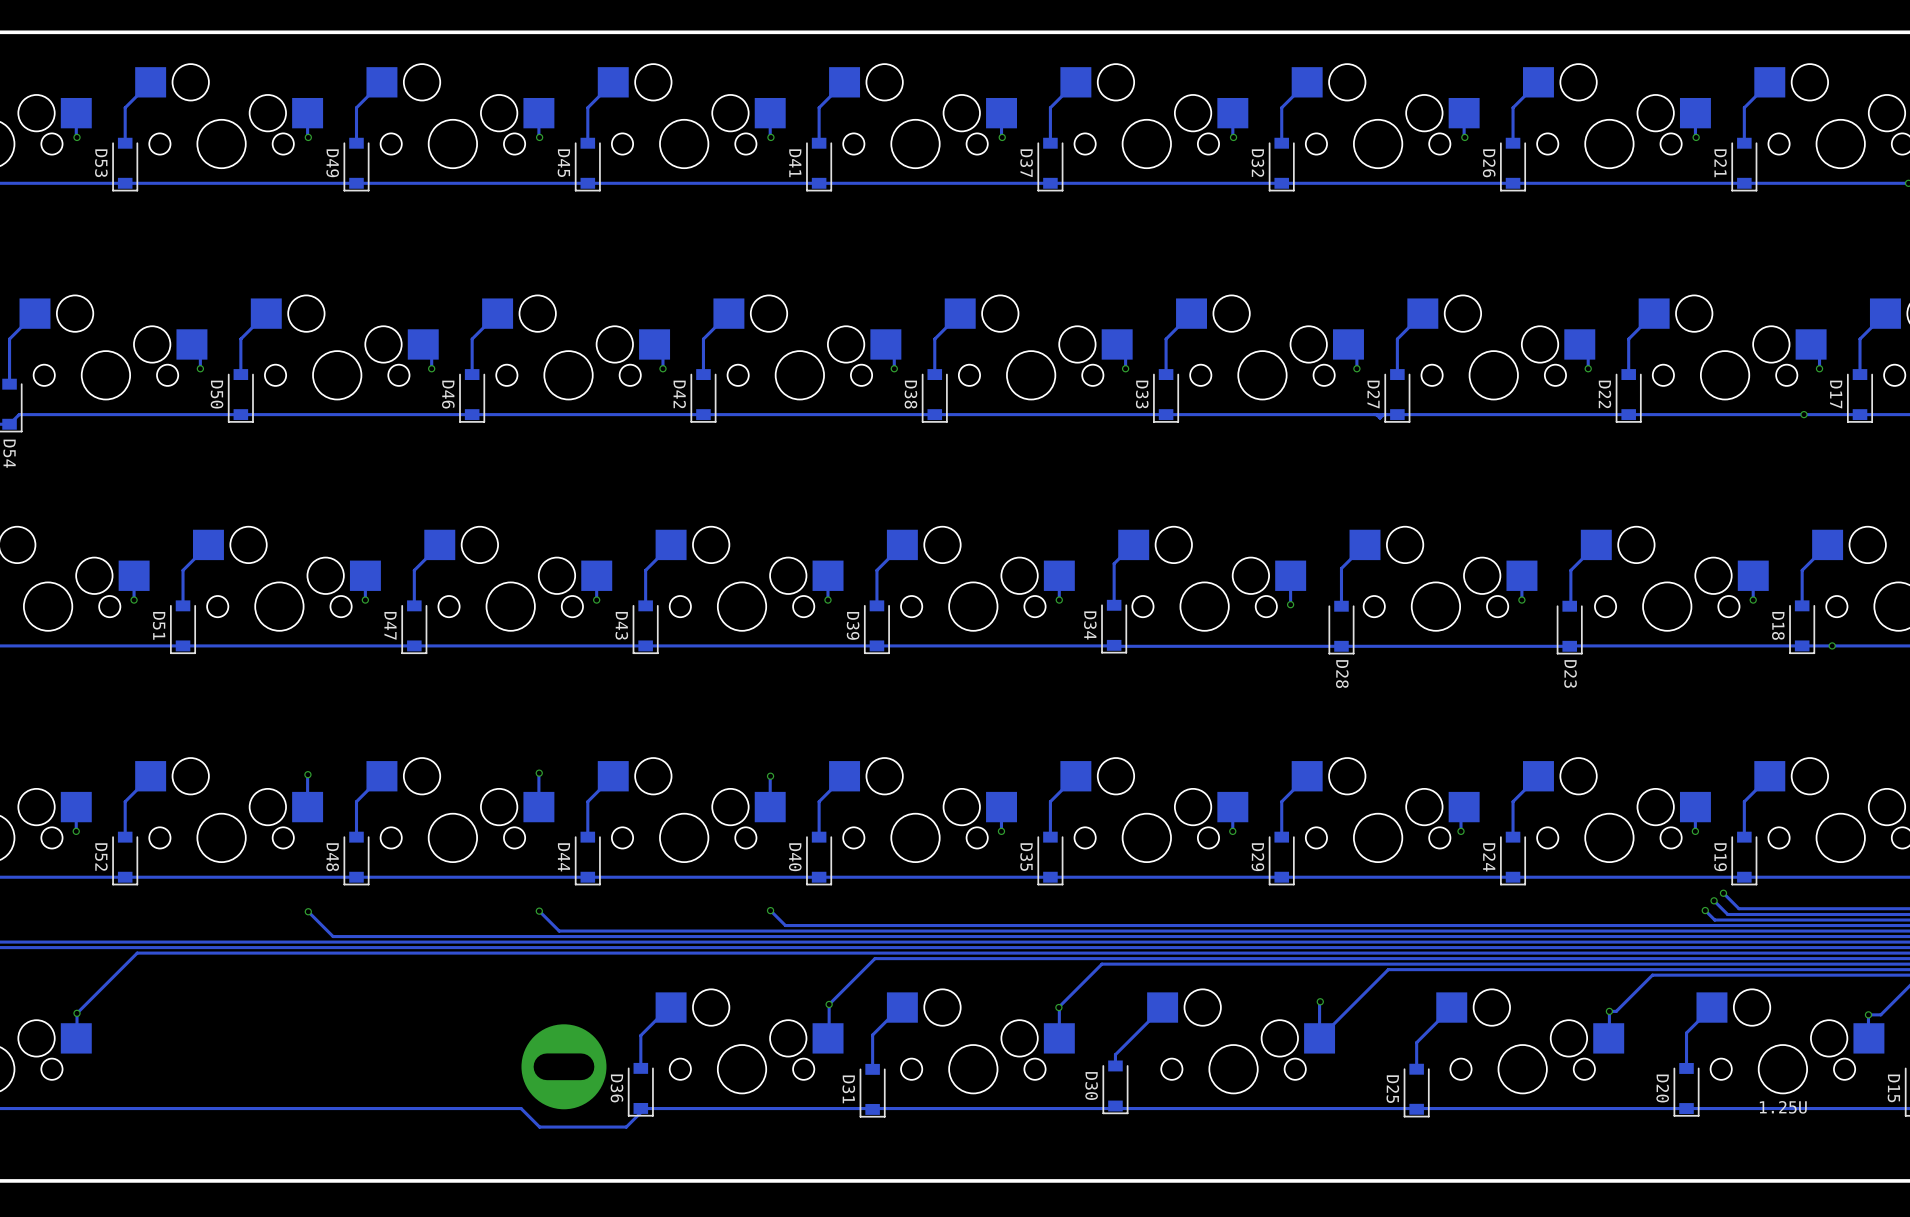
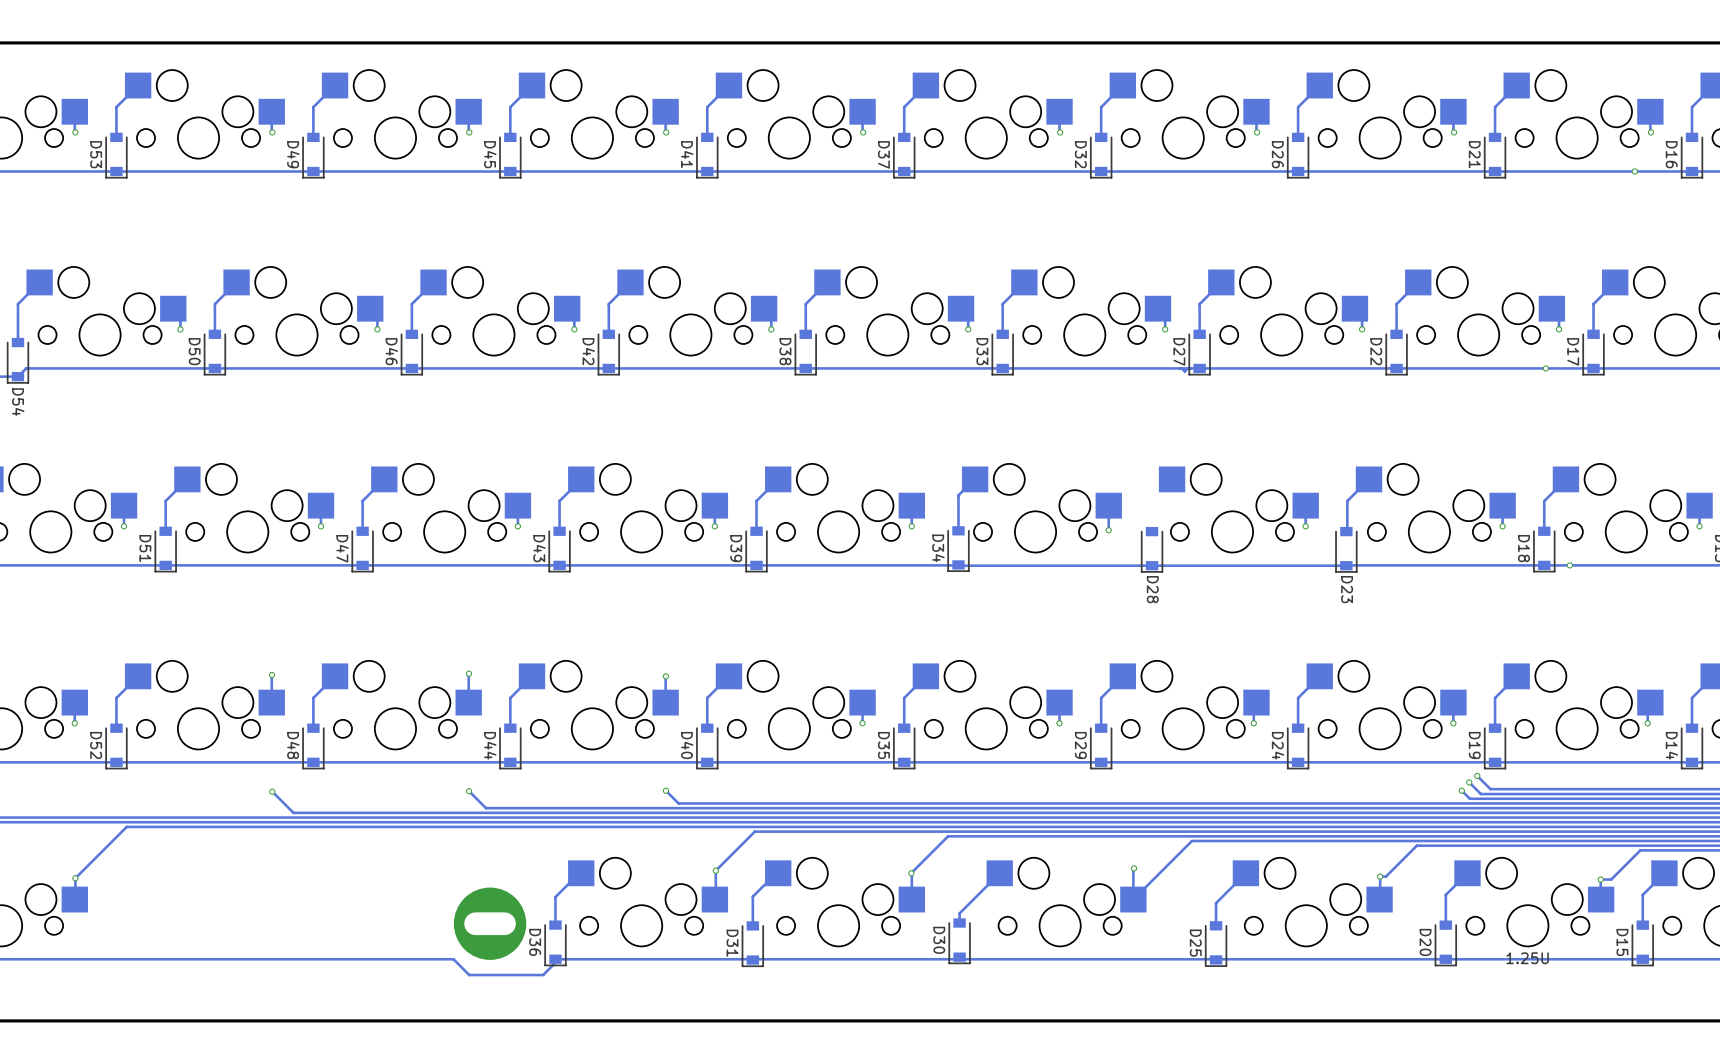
track: (1365, 544) (1341, 568) (1341, 606) -> none

